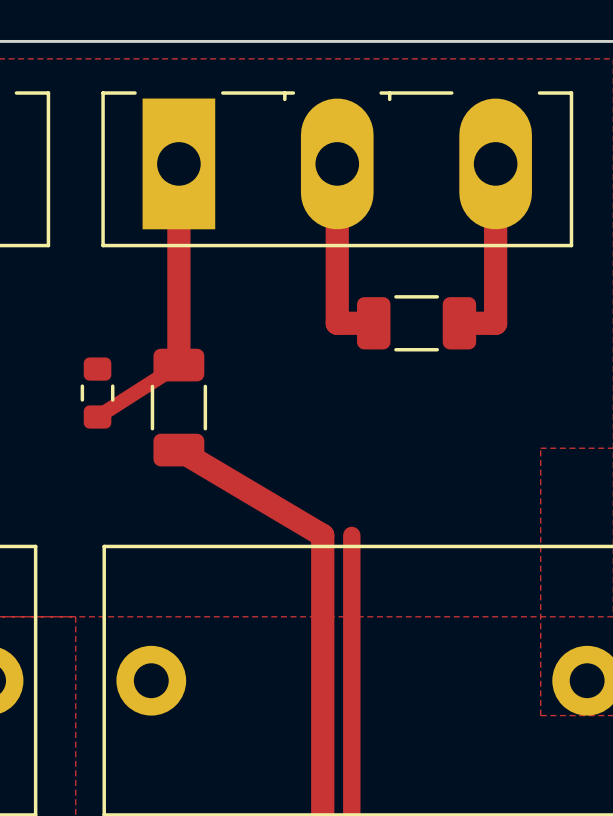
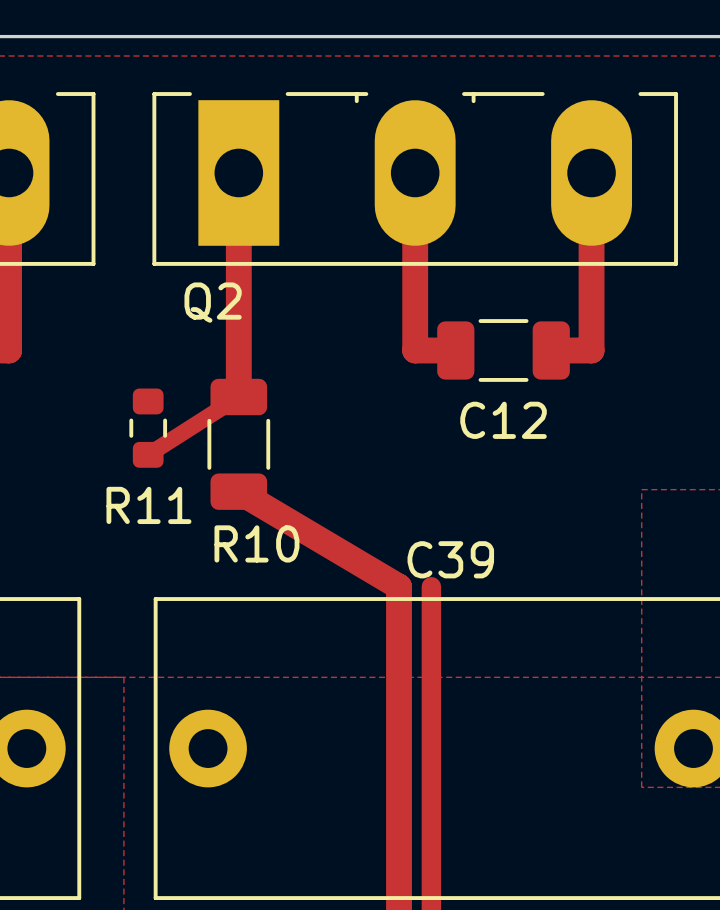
Q2 name: none -> Q2 (213, 302)
C12 name: none -> C12 (503, 420)
R11 name: none -> R11 (148, 505)
R10 name: none -> R10 (256, 543)
C39 name: none -> C39 (450, 559)

